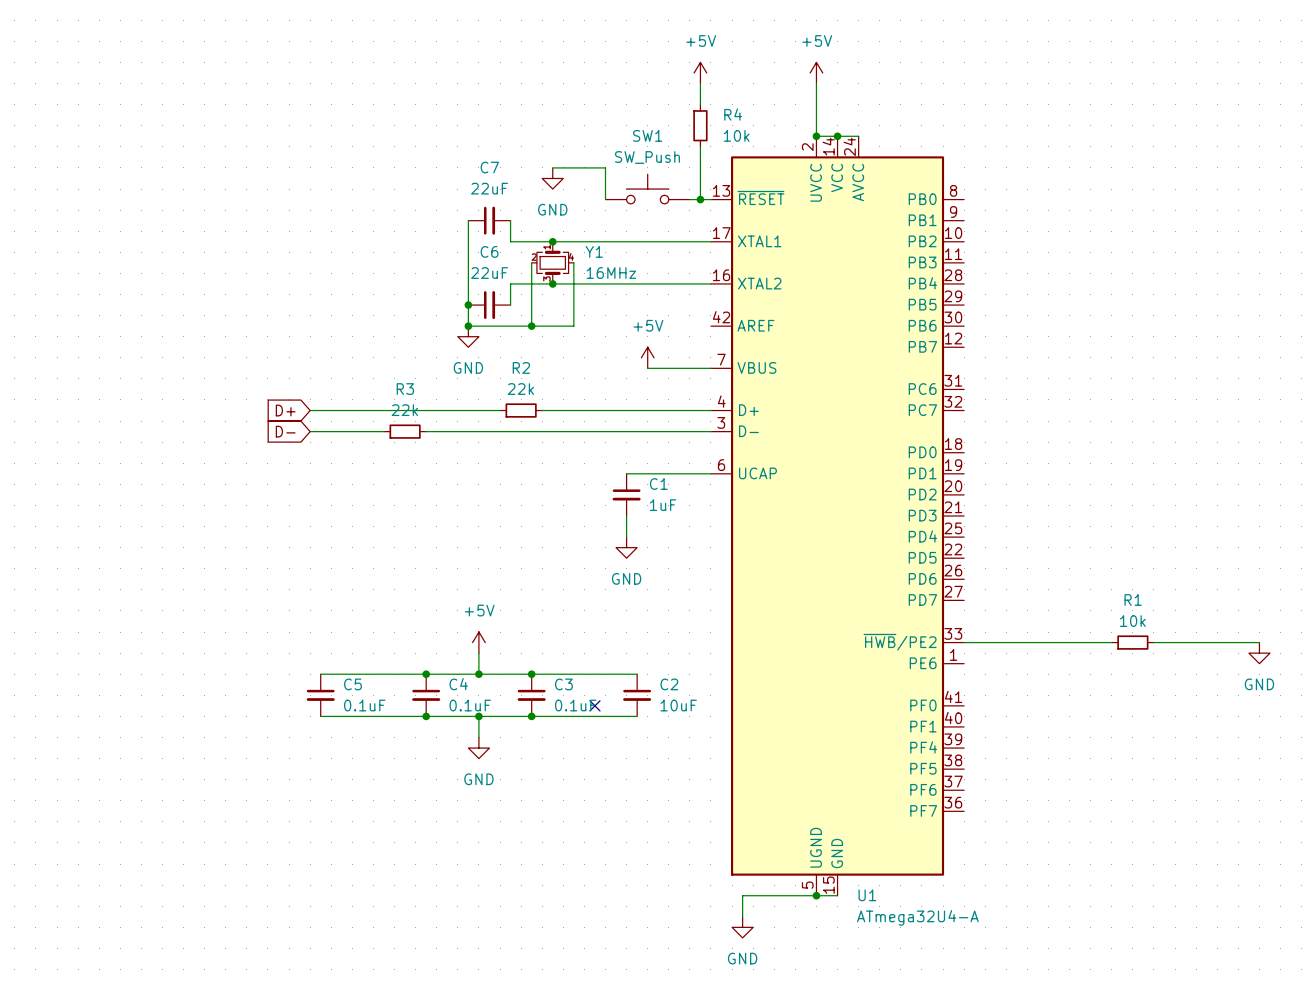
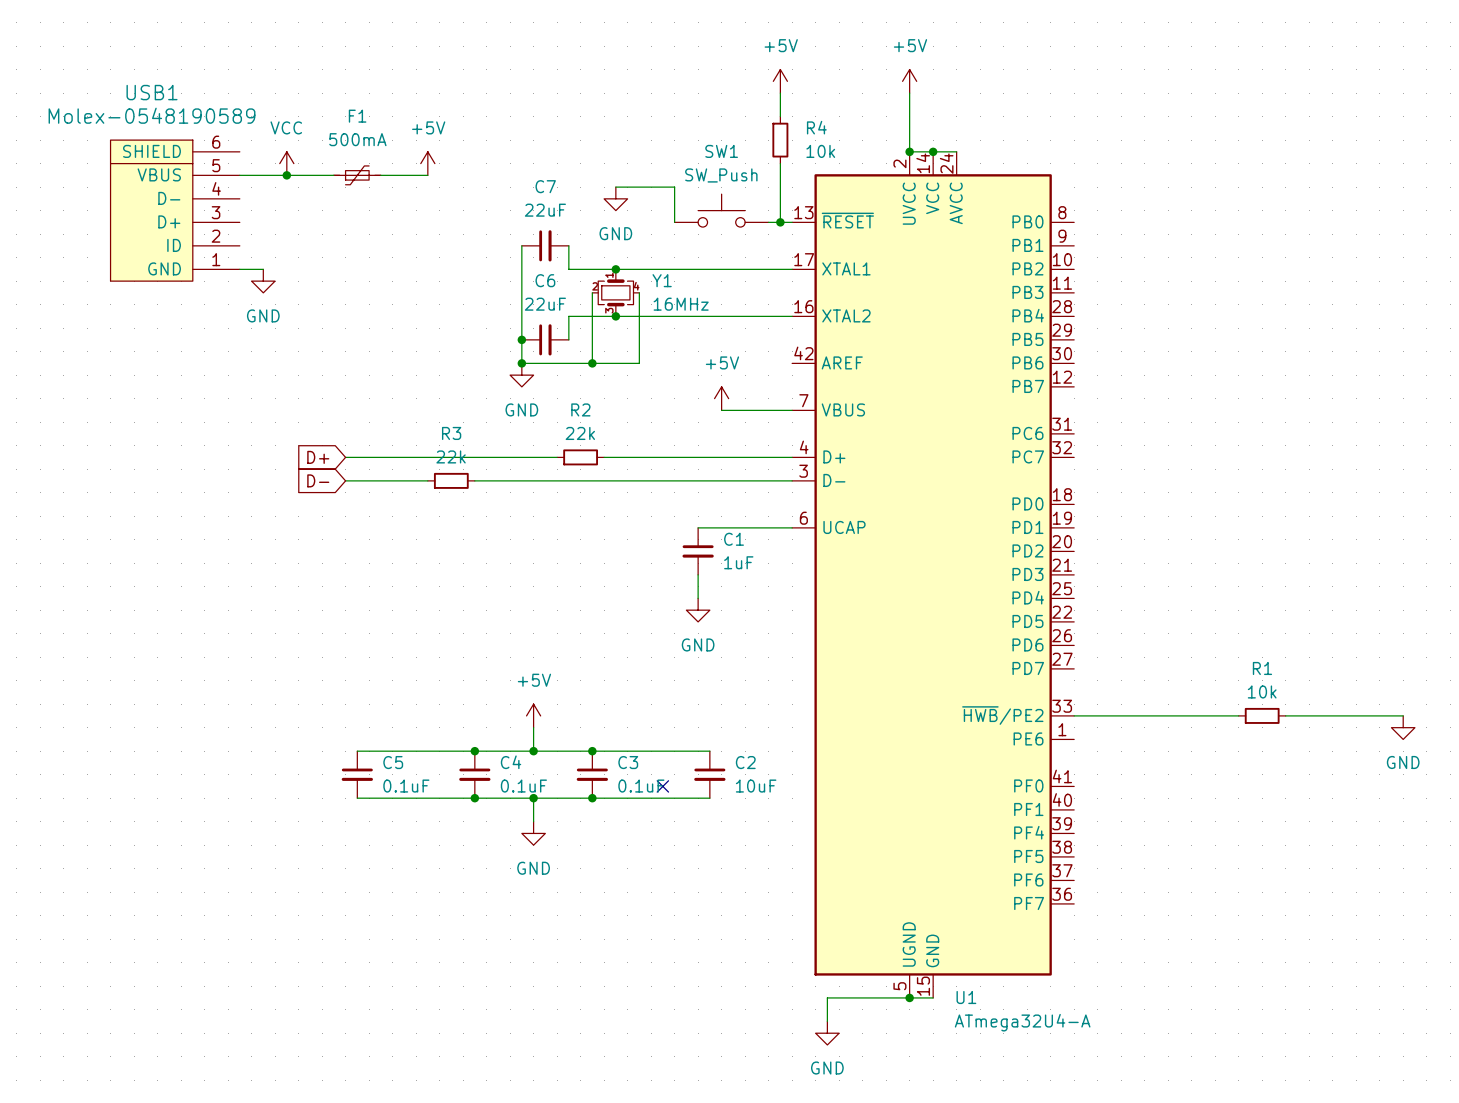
power symbol: none -> VCC (286, 163)
power symbol: none -> +5V (427, 163)
wire: none -> (239, 175) (333, 175)
junction: none -> (286, 175)
F1: none -> 500mA (357, 175)
wire: none -> (380, 175) (427, 175)
USB1: none -> Molex-0548190589 (175, 210)
wire: none -> (239, 269) (263, 269)
power symbol: none -> GND (263, 281)

